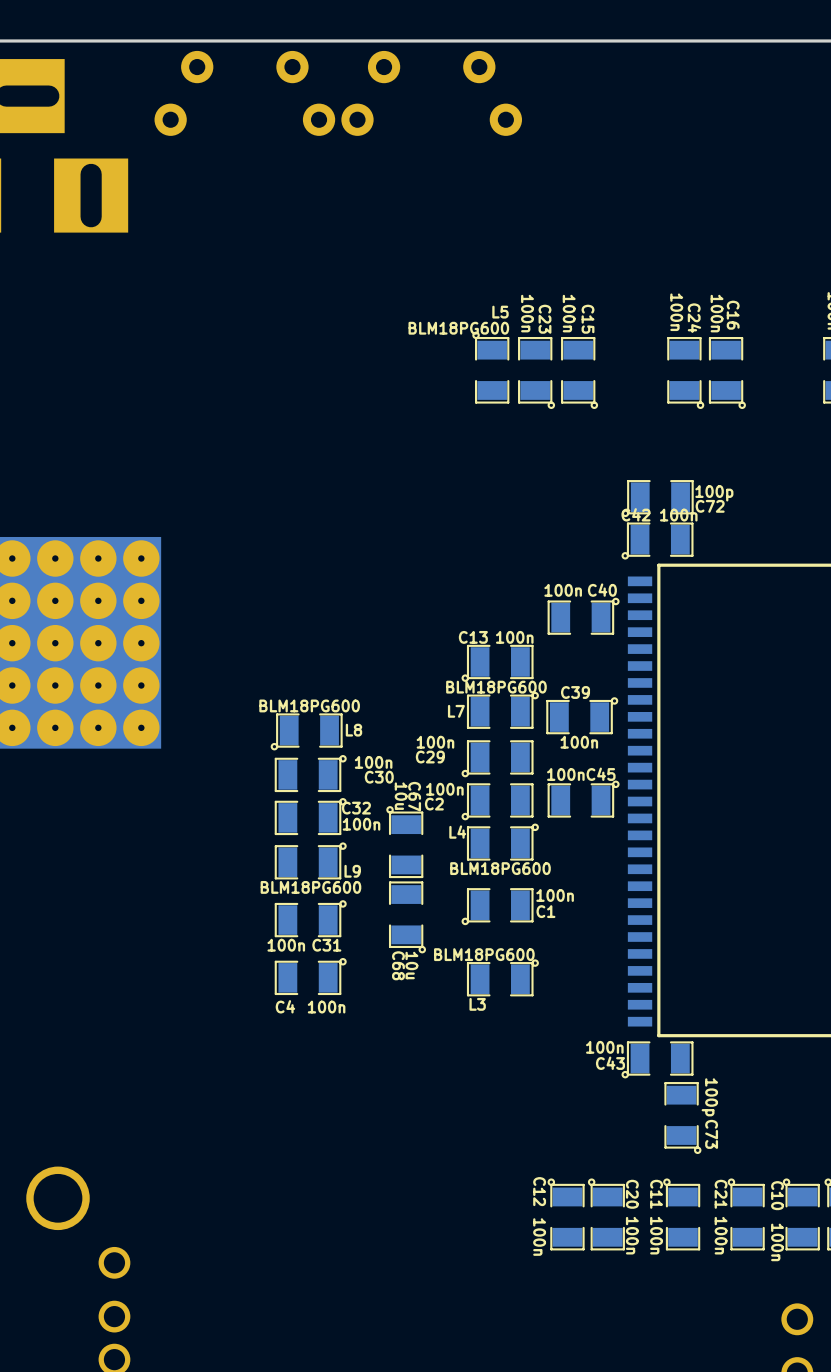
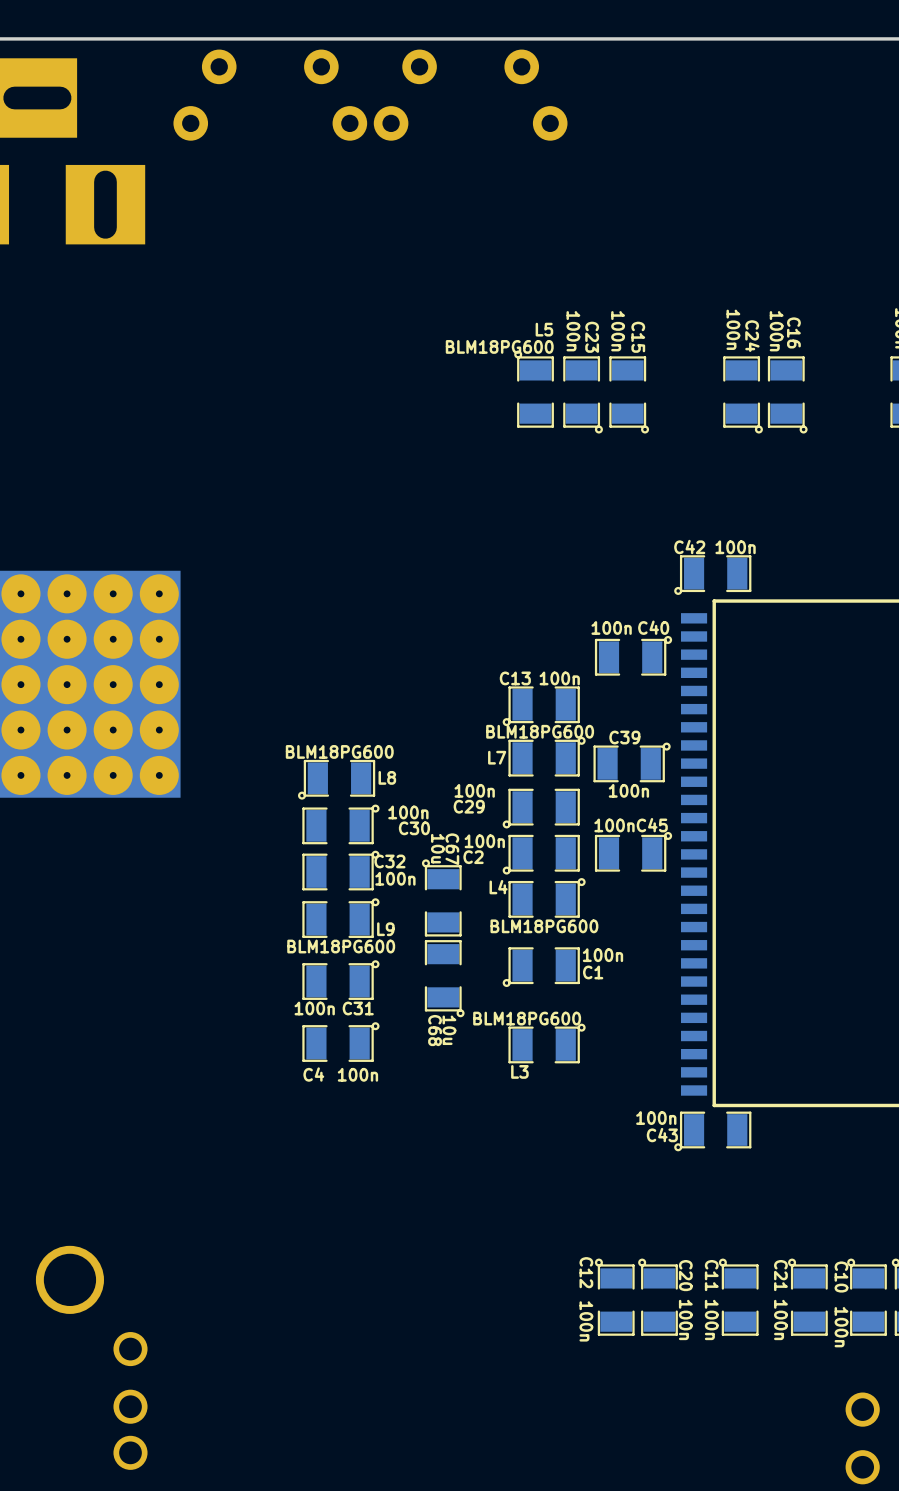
C72: 100p (657, 498) -> none
C73: 100p (682, 1118) -> none

